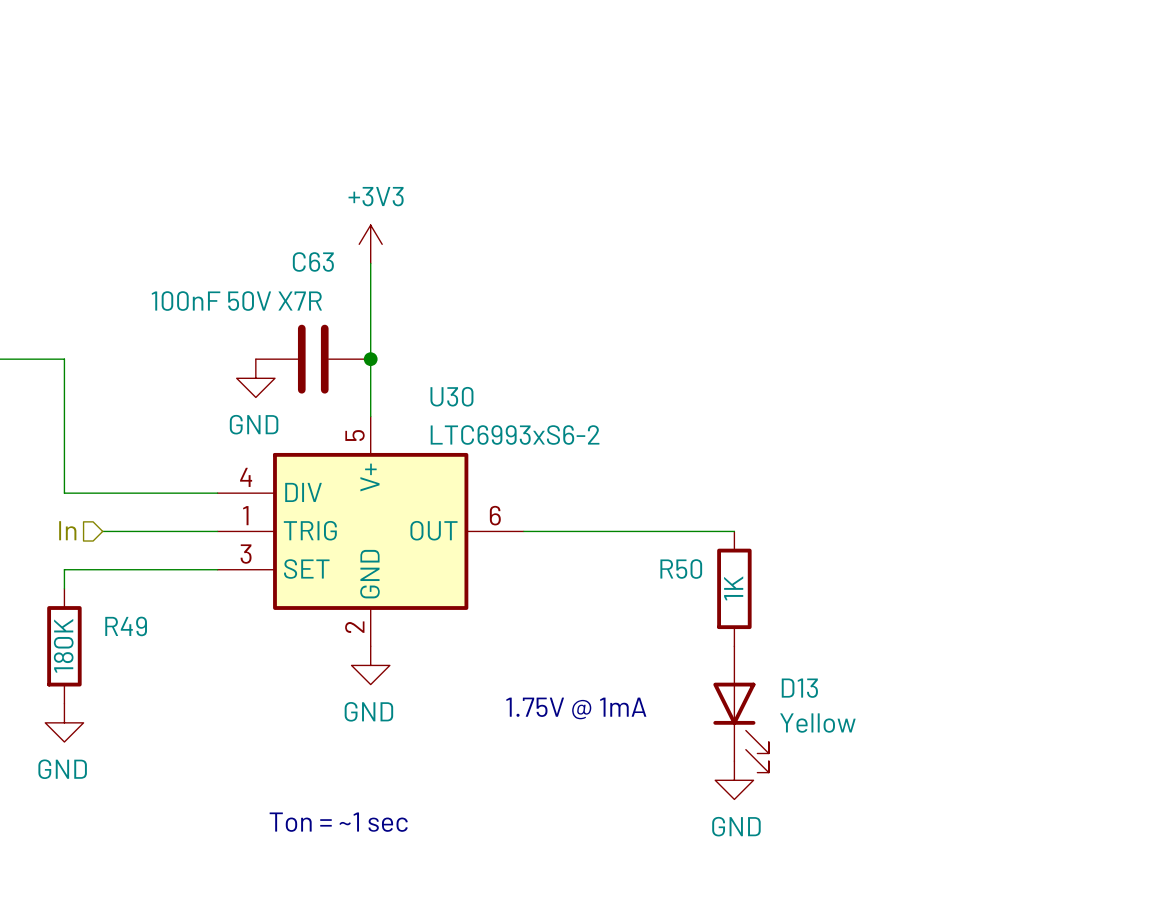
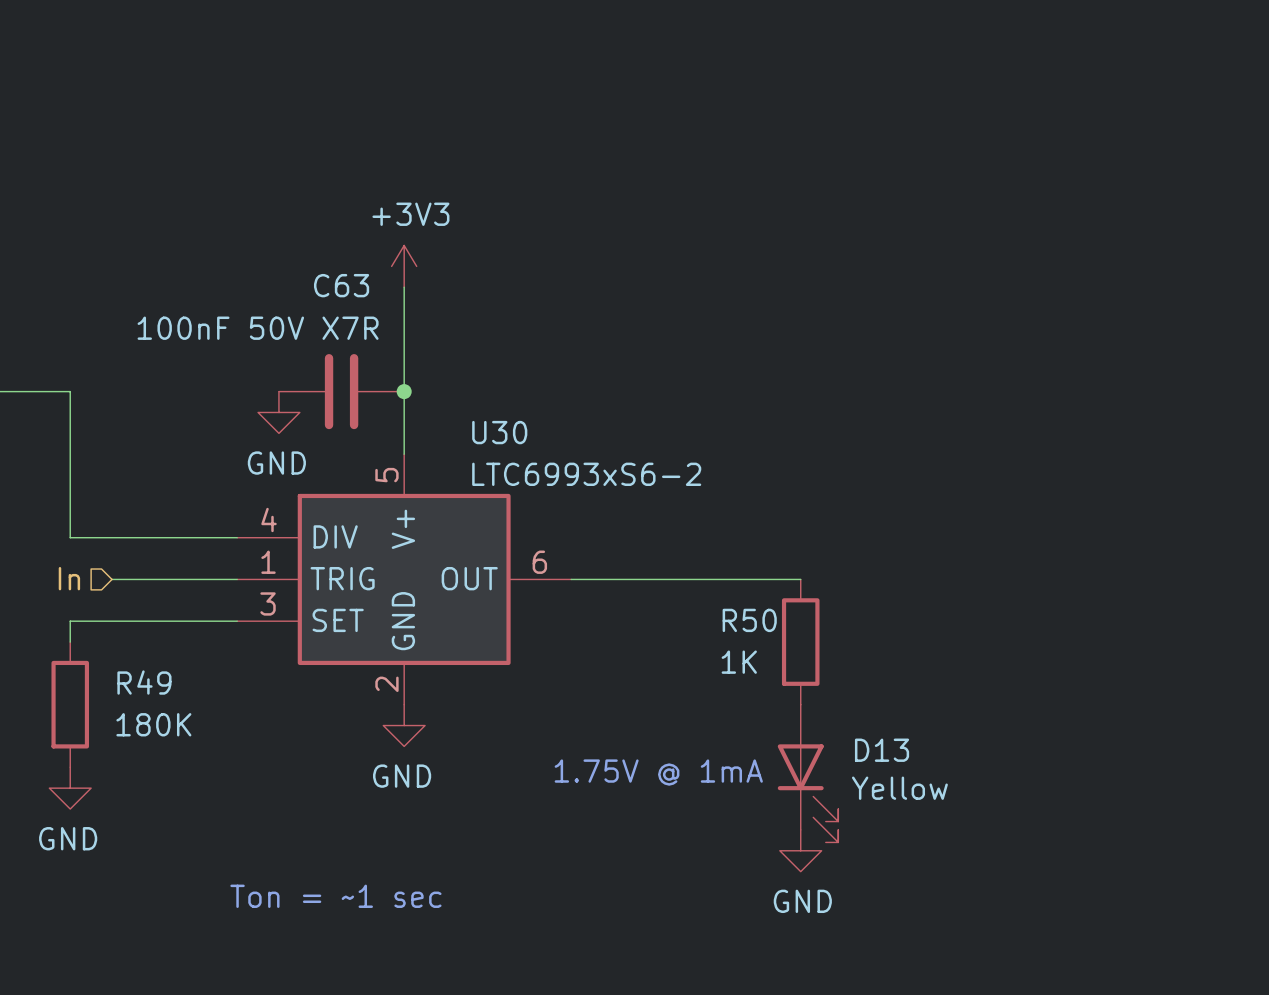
R50 value rotation: 0° (733, 588) -> 90° clockwise (739, 662)
R50 value position: 1K (733, 588) -> 1K (739, 662)
R49 value rotation: 0° (63, 645) -> 90° clockwise (153, 724)

